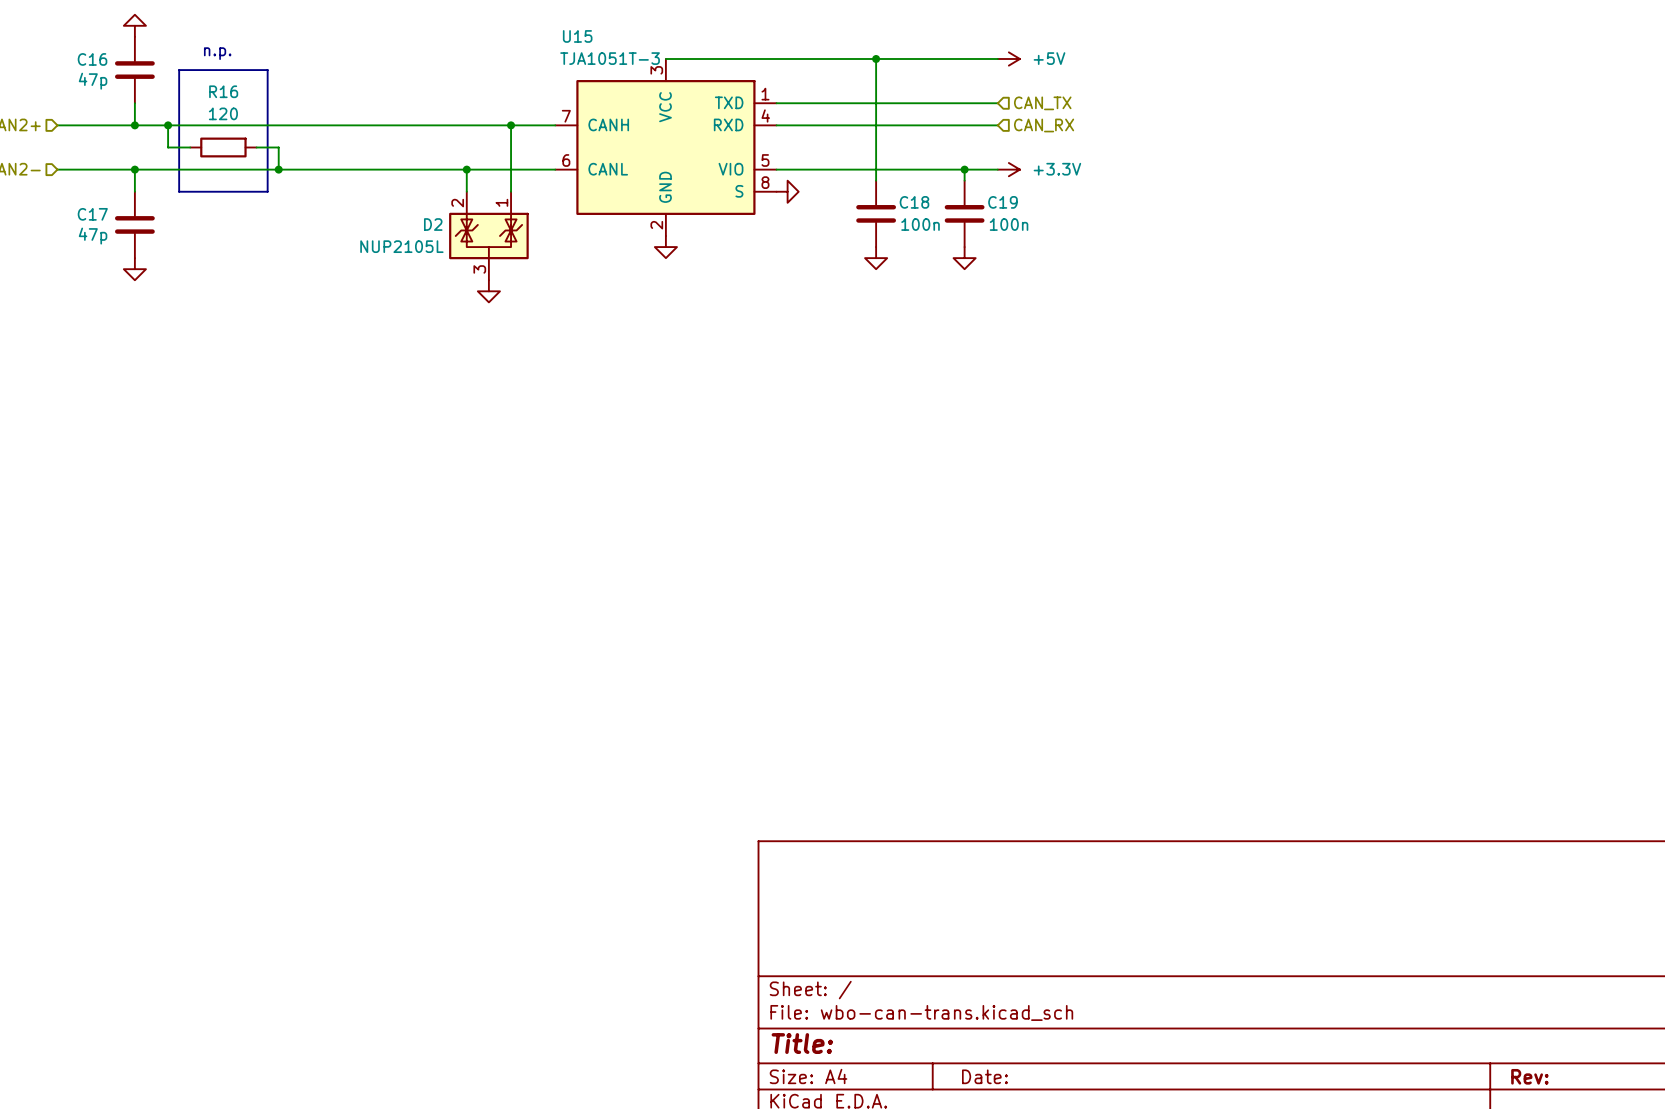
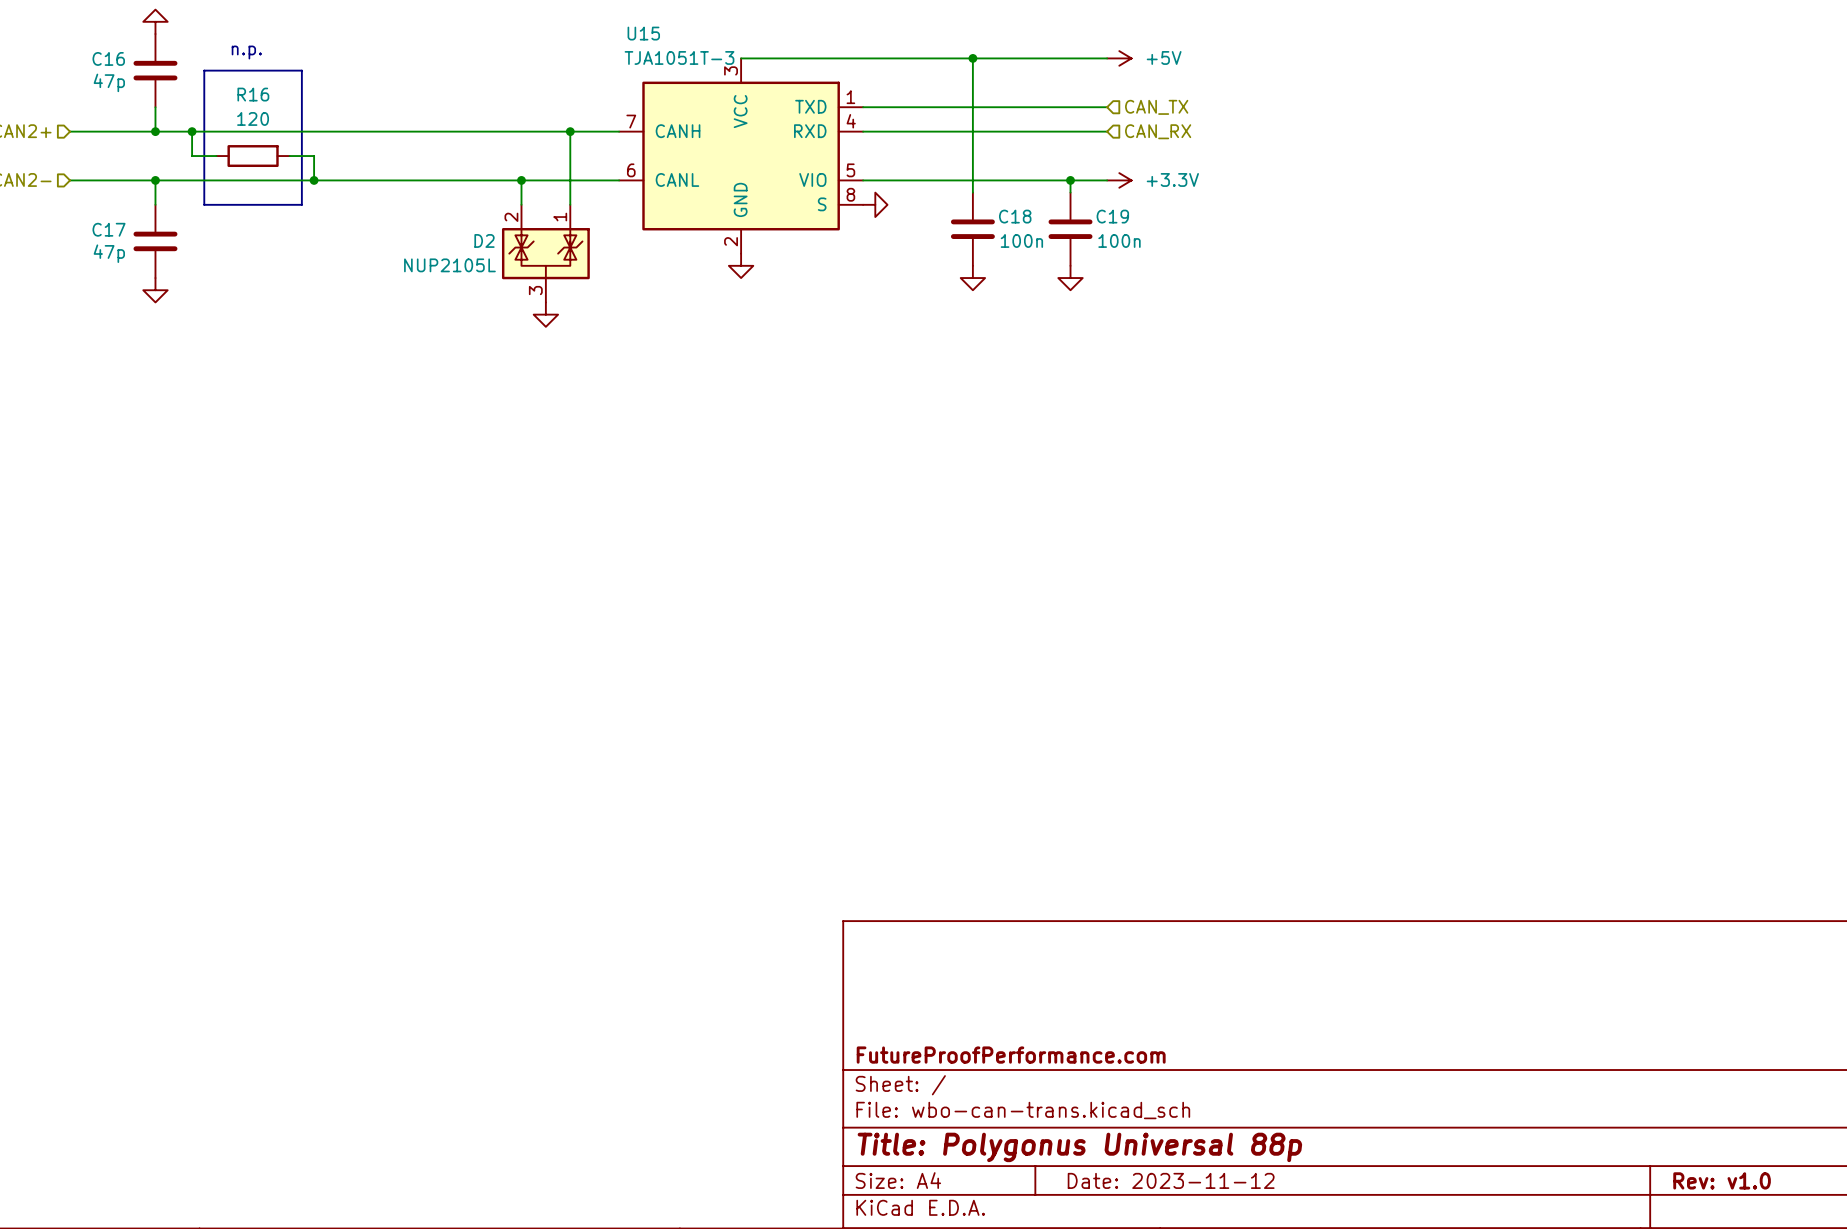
title block: none -> FutureProofPerformance.com (1011, 1055)
title block: Title: (802, 1043) -> Title: Polygonus Universal 88p (1079, 1147)
title block: Date: (984, 1076) -> Date: 2023-11-12 (1171, 1180)
title block: Rev: (1529, 1076) -> Rev: v1.0 (1722, 1180)

